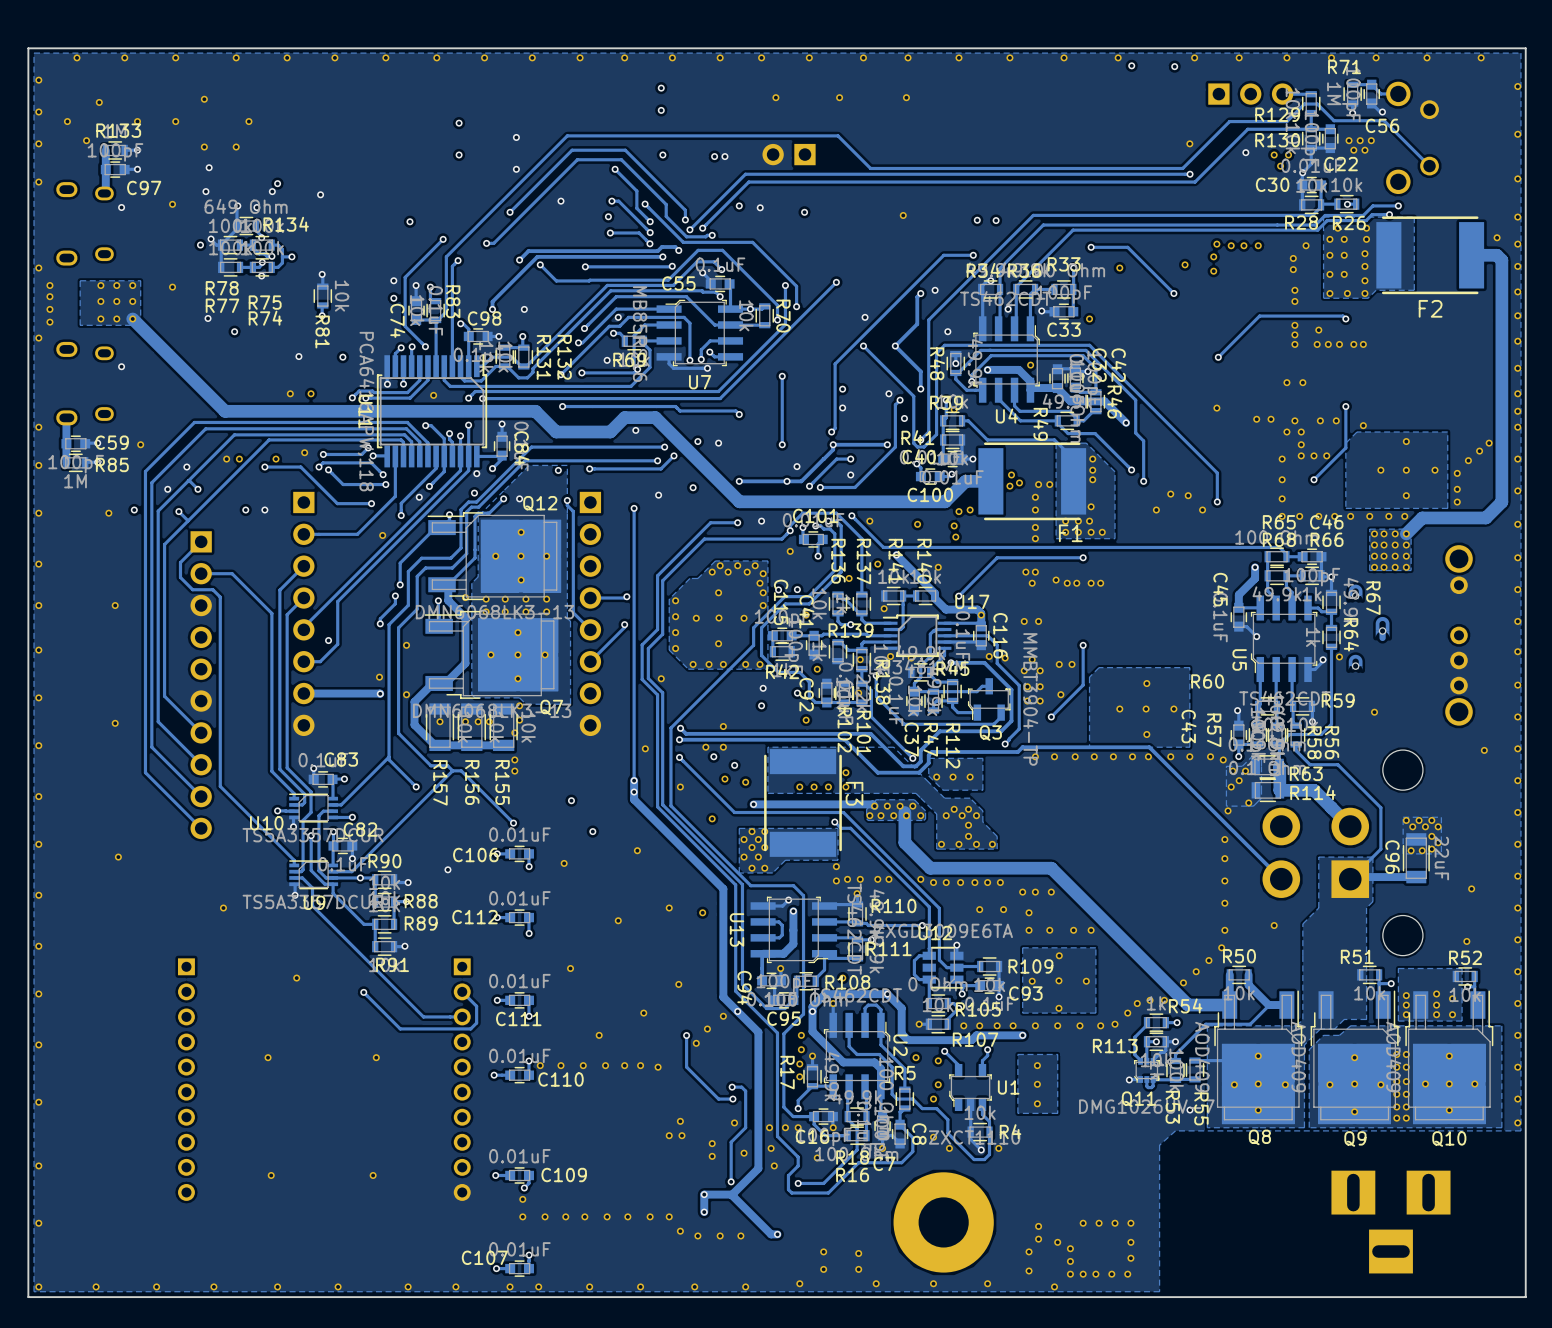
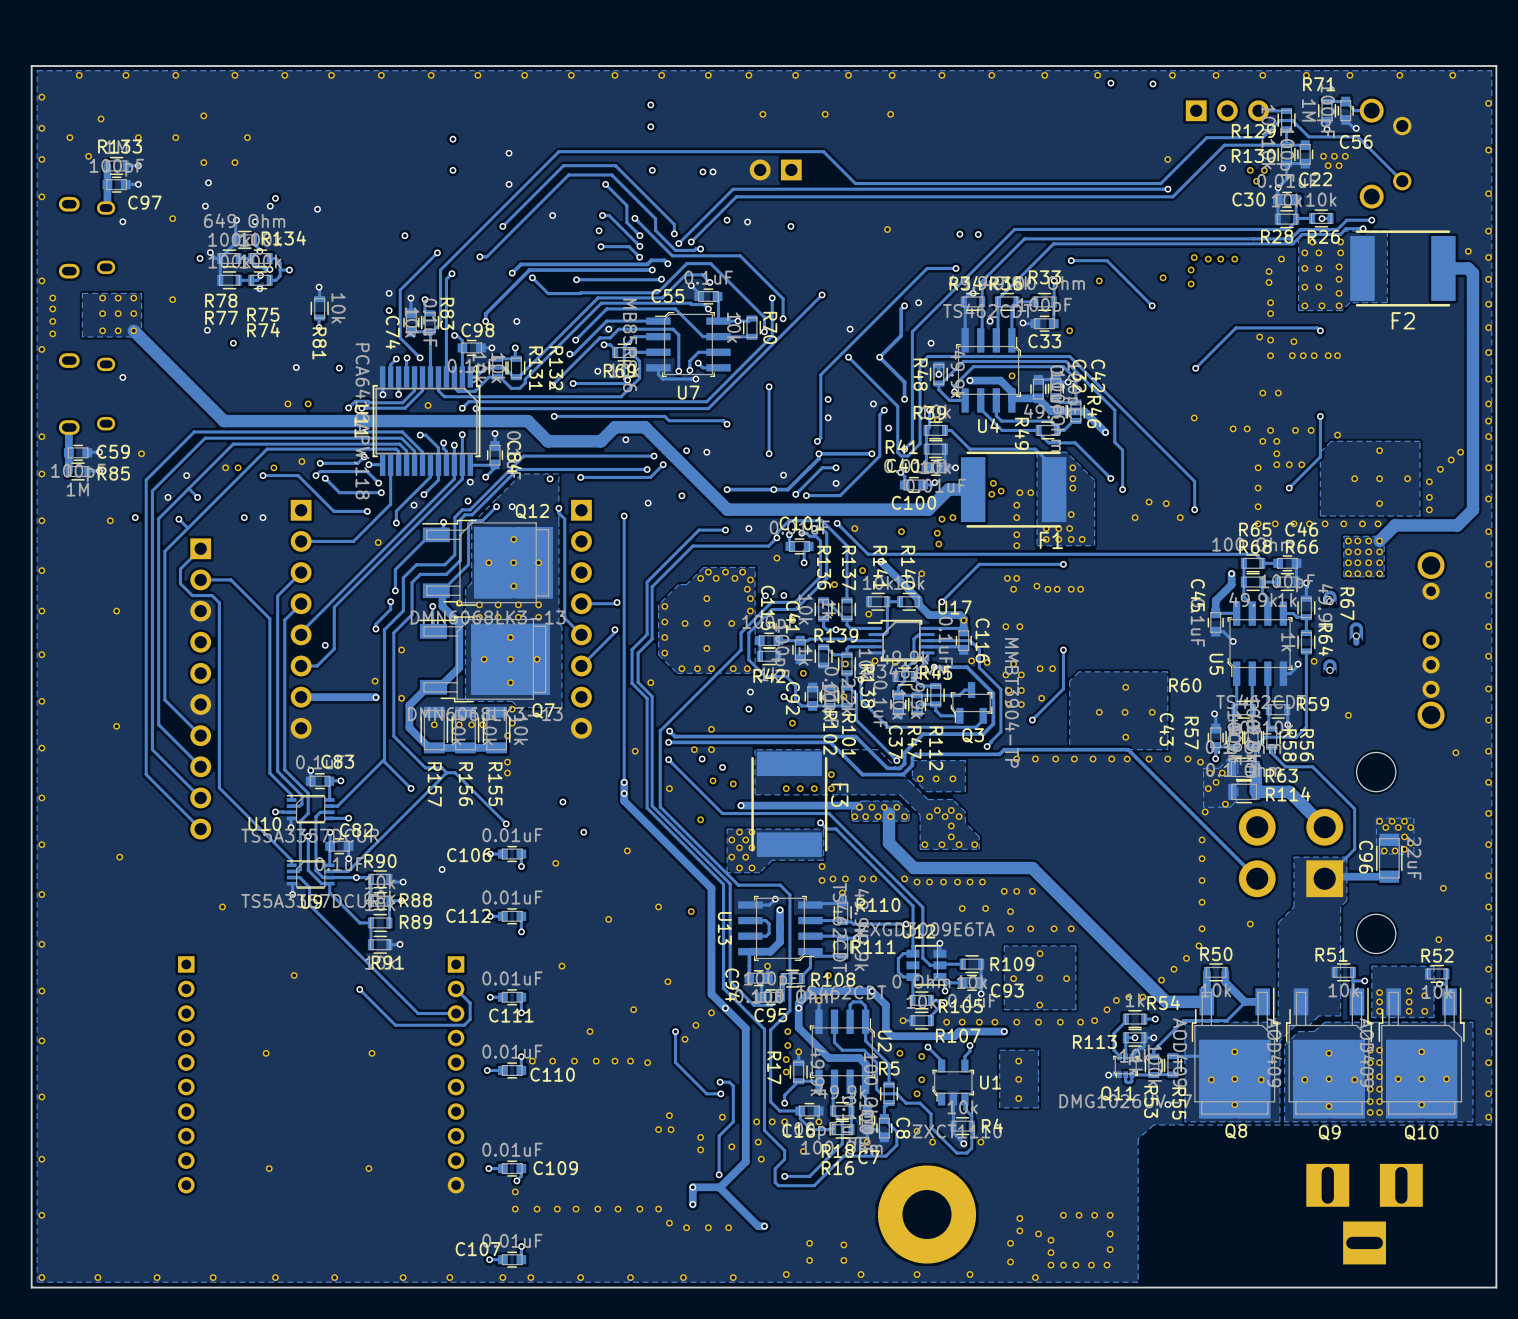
part: none -> (1259, 336)
part: (1294, 325) -> none
part: none -> (1270, 340)
part: (1294, 334) -> none

